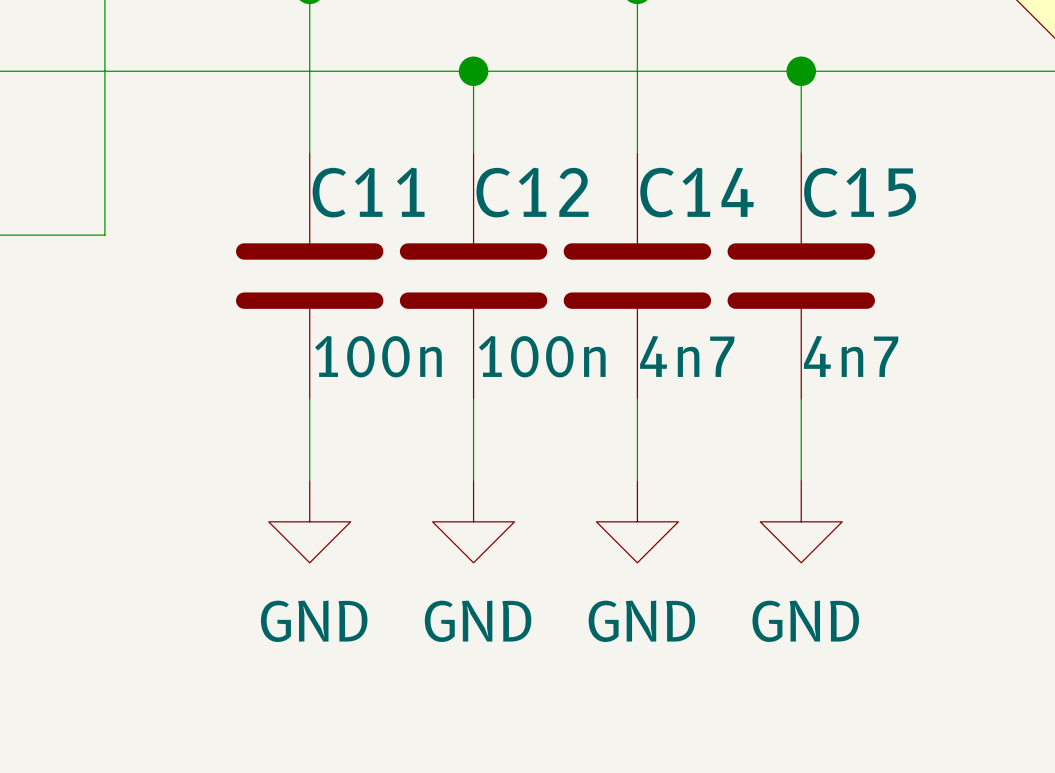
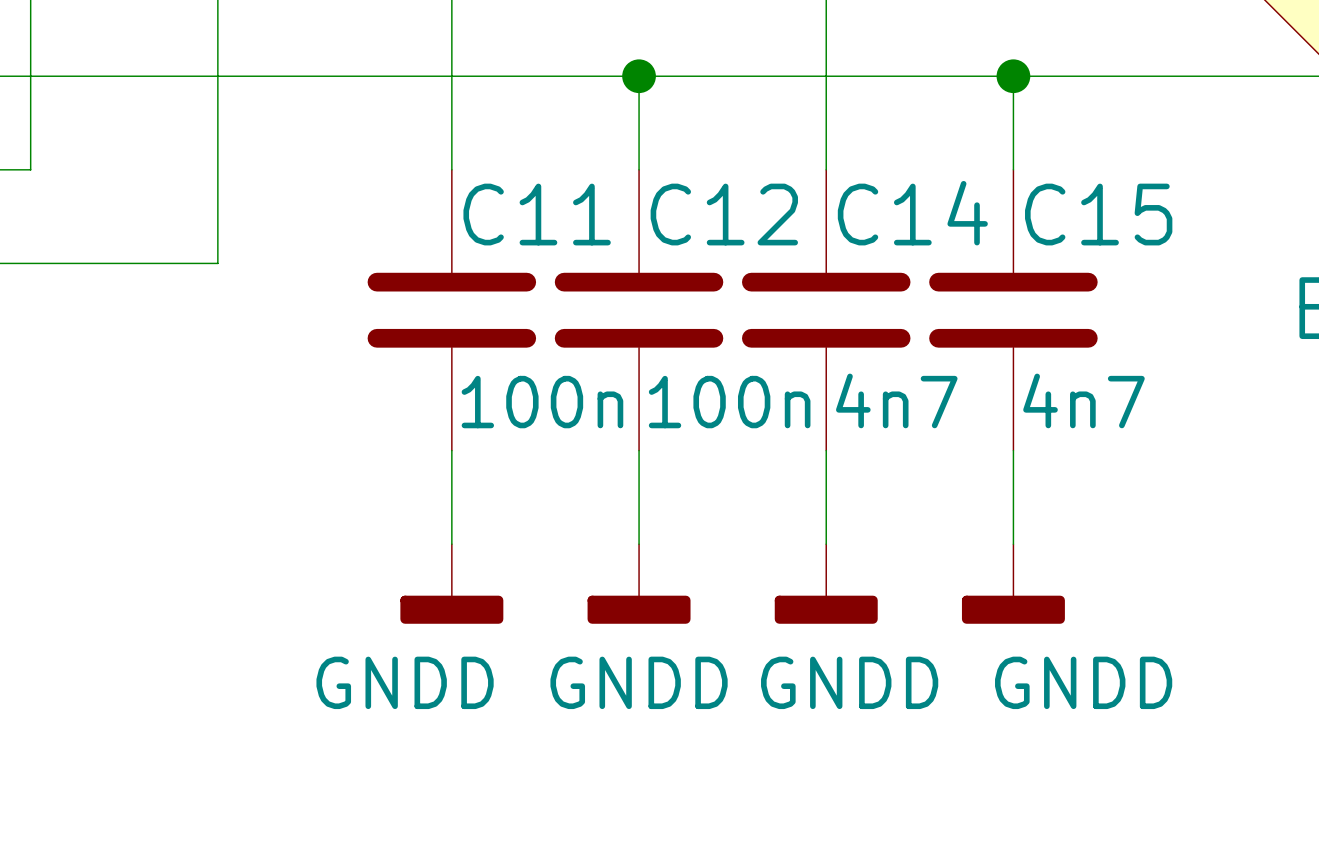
power symbol: GND (309, 521) -> GNDD (451, 583)
power symbol: GND (473, 521) -> GNDD (639, 583)
power symbol: GND (637, 521) -> GNDD (826, 583)
power symbol: GND (801, 521) -> GNDD (1013, 583)

